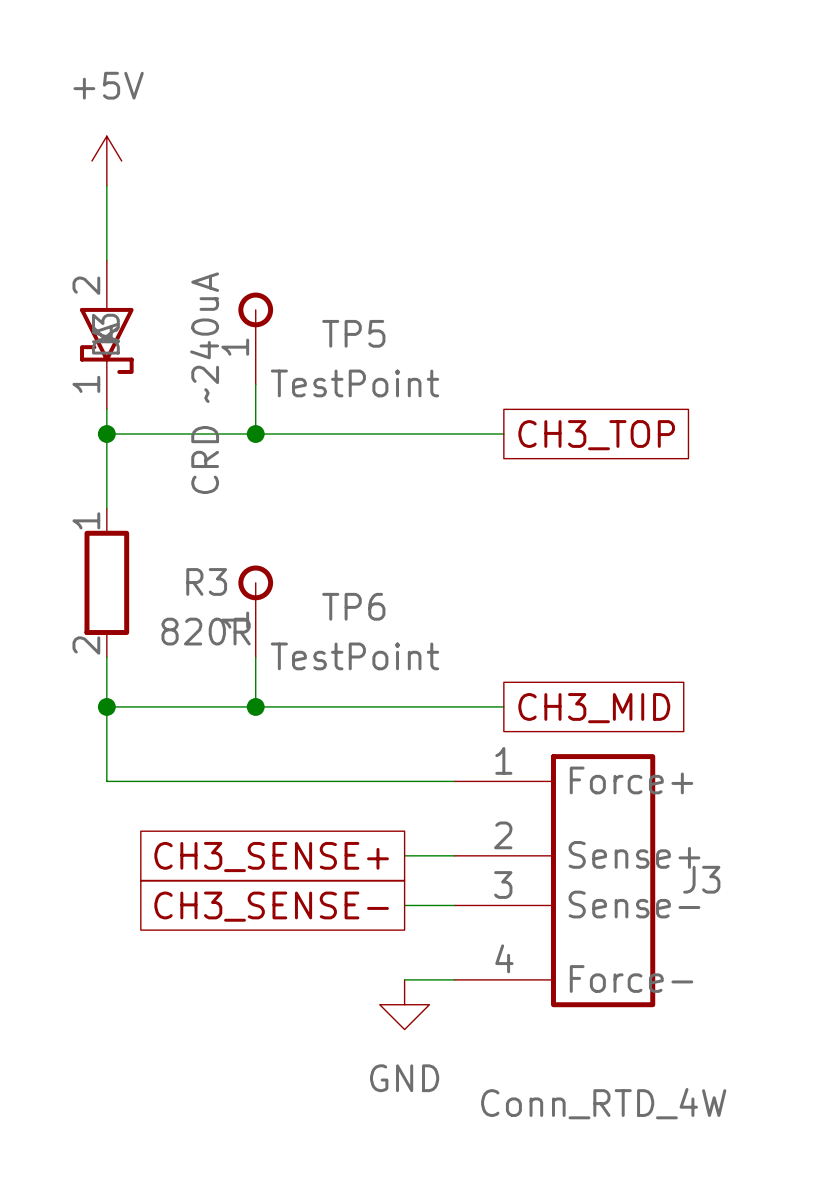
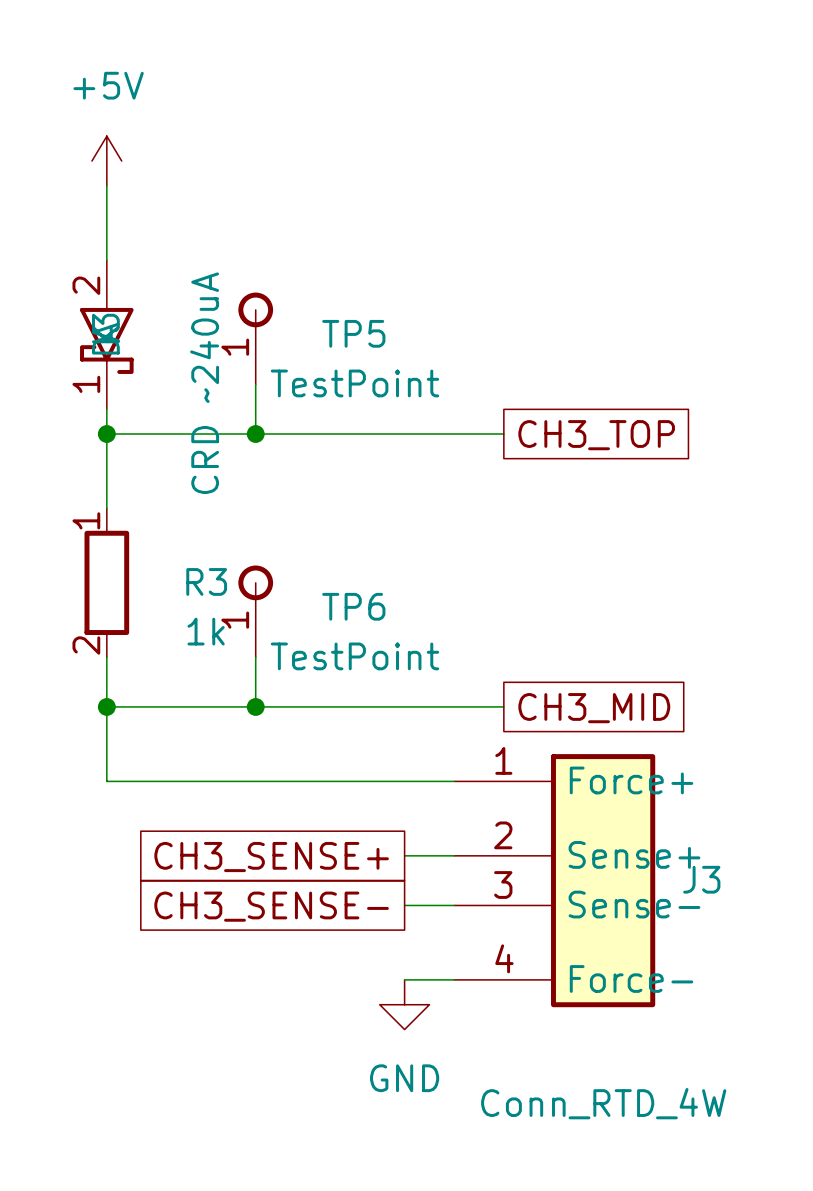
R3 value: 820R (206, 631) -> 1k (206, 631)

